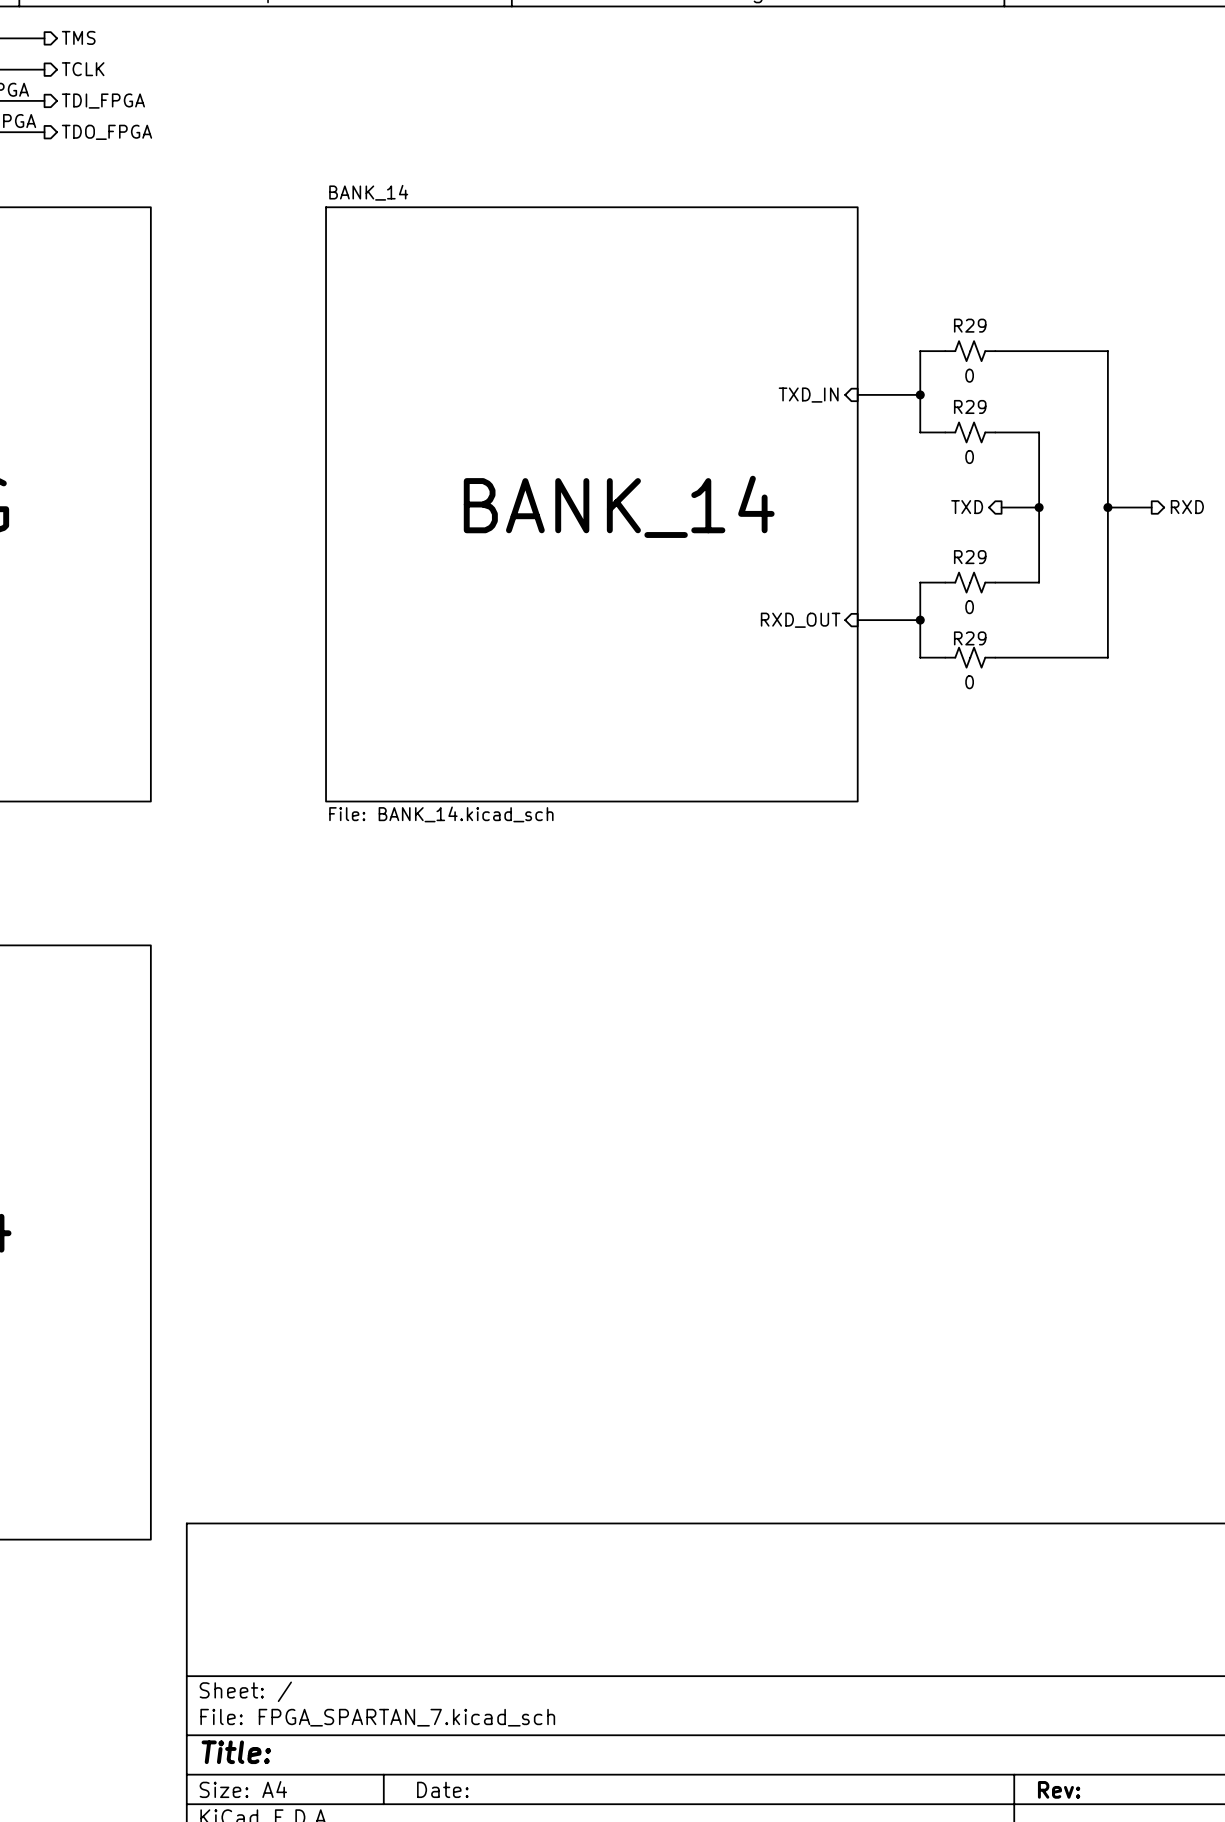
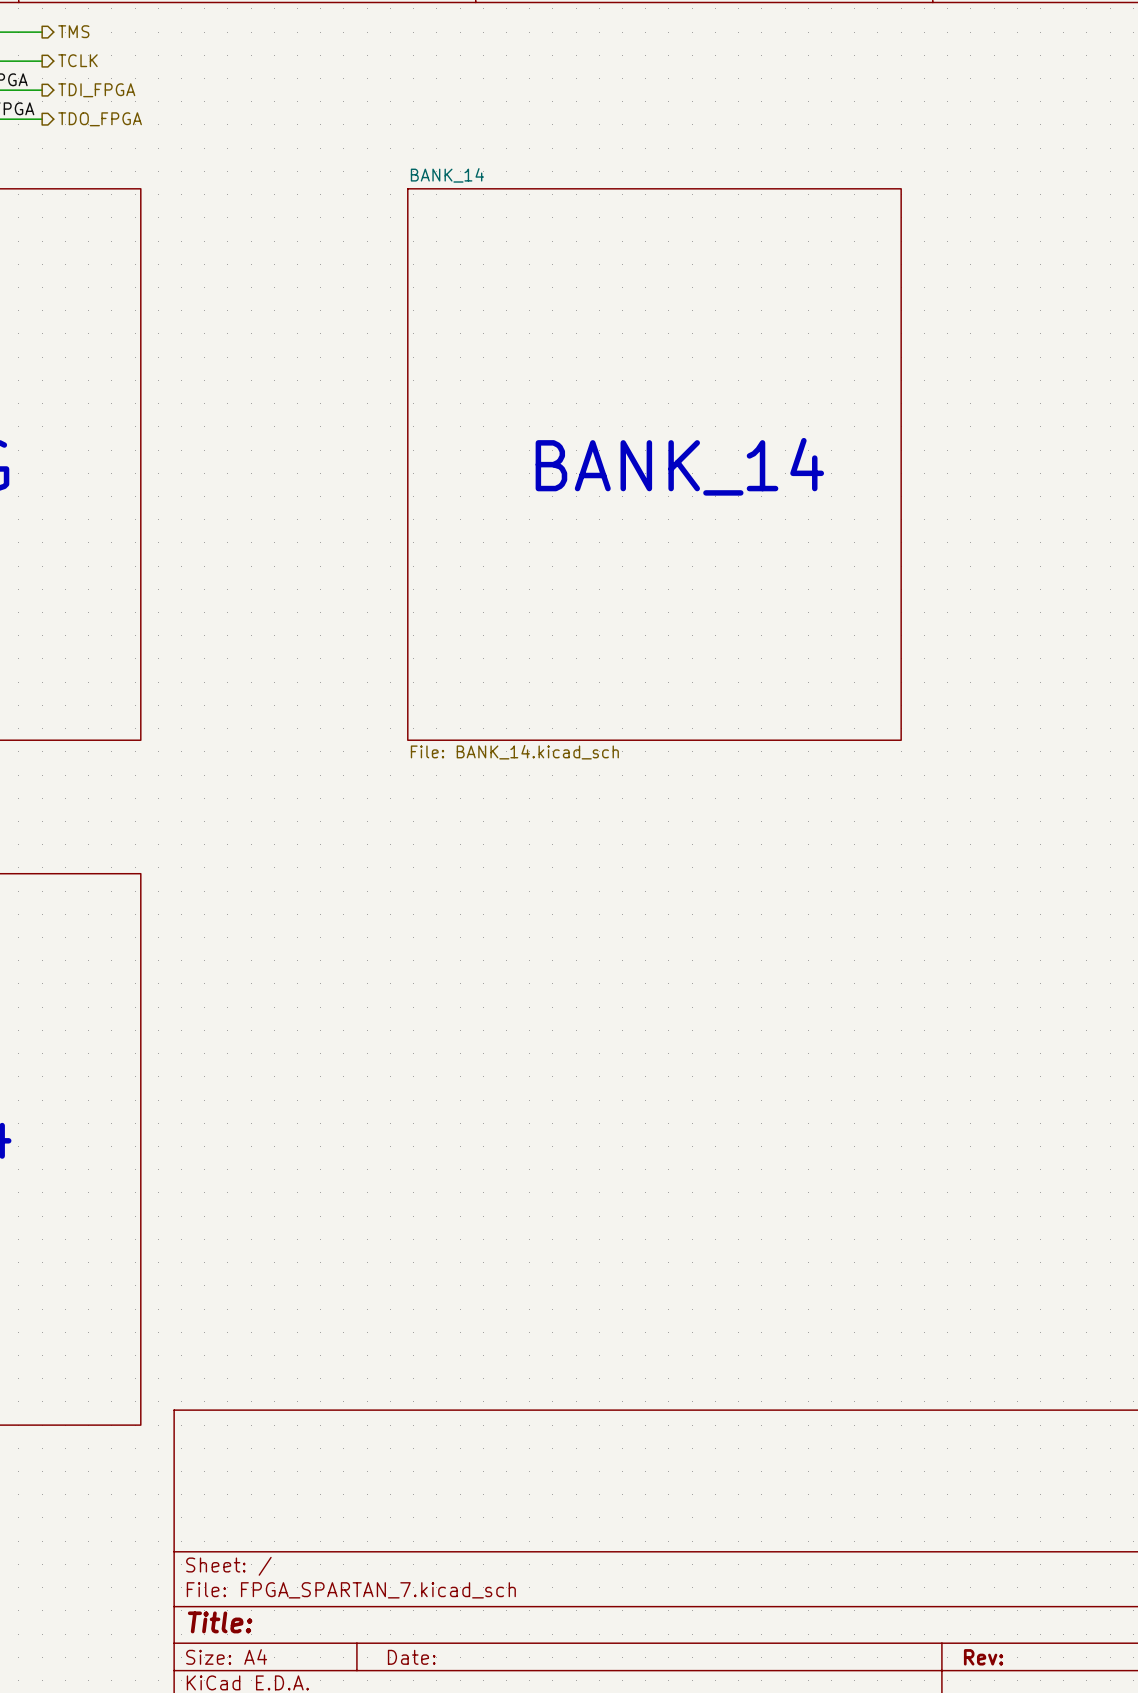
wire: (945, 351) (920, 351) (920, 432) (945, 432) -> none
R29: 0 (970, 351) -> none
wire: (995, 351) (1107, 351) (1107, 657) (995, 657) -> none
wire: (857, 394) (920, 394) -> none
junction: (920, 394) -> none
sheet pin: TXD_IN (808, 395) -> none
R29: 0 (970, 432) -> none
wire: (995, 432) (1039, 432) (1039, 582) (995, 582) -> none
sheet BANK_14 position: (591, 504) -> (654, 464)
text position: BANK_14 (619, 506) -> BANK_14 (679, 466)
hierarchical label: TXD (967, 507) -> none
wire: (1001, 507) (1039, 507) -> none
junction: (1039, 507) -> none
wire: (1107, 507) (1151, 507) -> none
junction: (1107, 507) -> none
hierarchical label: RXD (1187, 507) -> none
wire: (945, 582) (920, 582) (920, 657) (945, 657) -> none
R29: 0 (970, 582) -> none
sheet pin: RXD_OUT (800, 620) -> none
wire: (857, 620) (920, 620) -> none
junction: (920, 620) -> none
R29: 0 (970, 657) -> none

